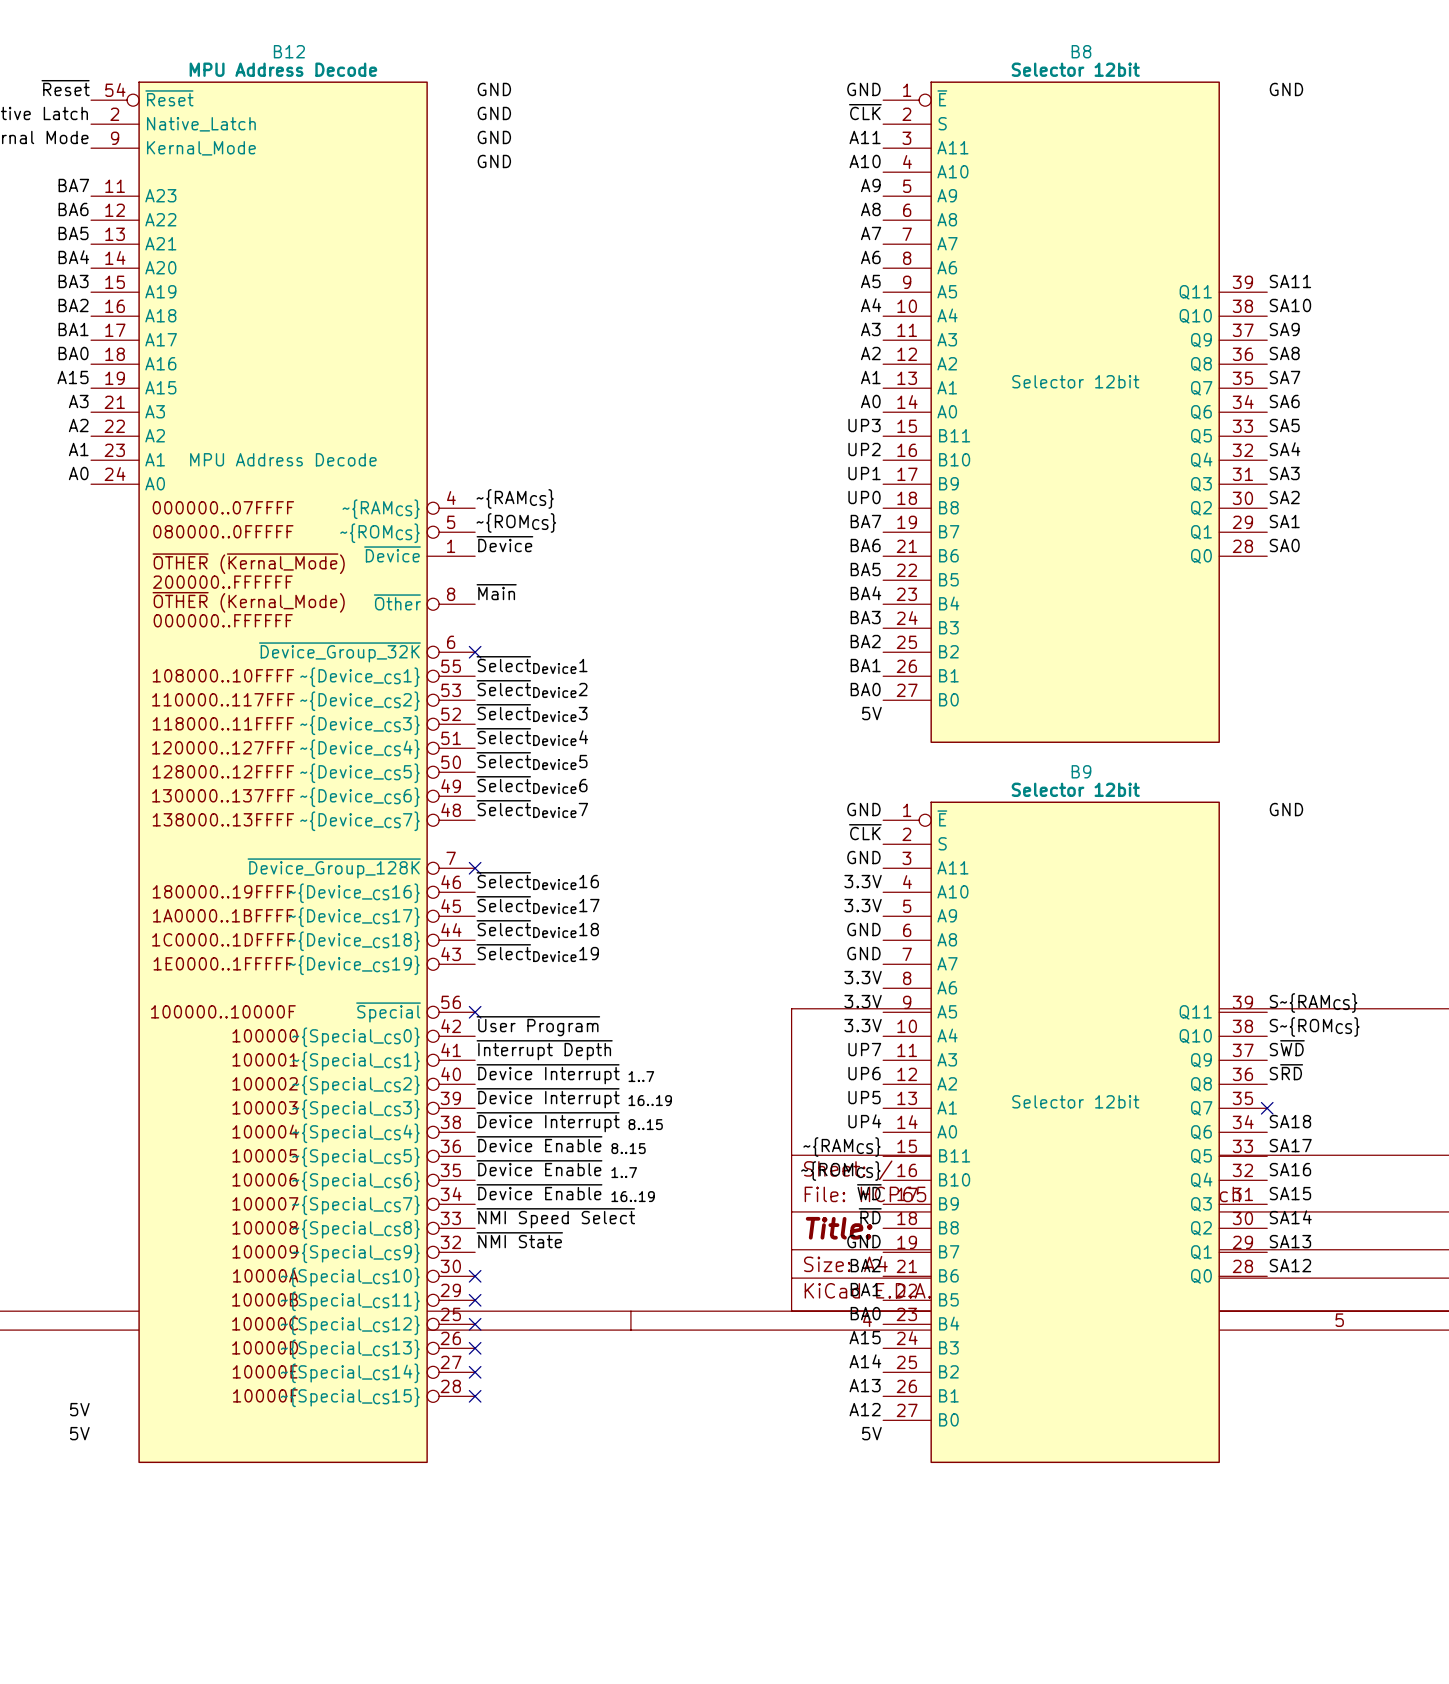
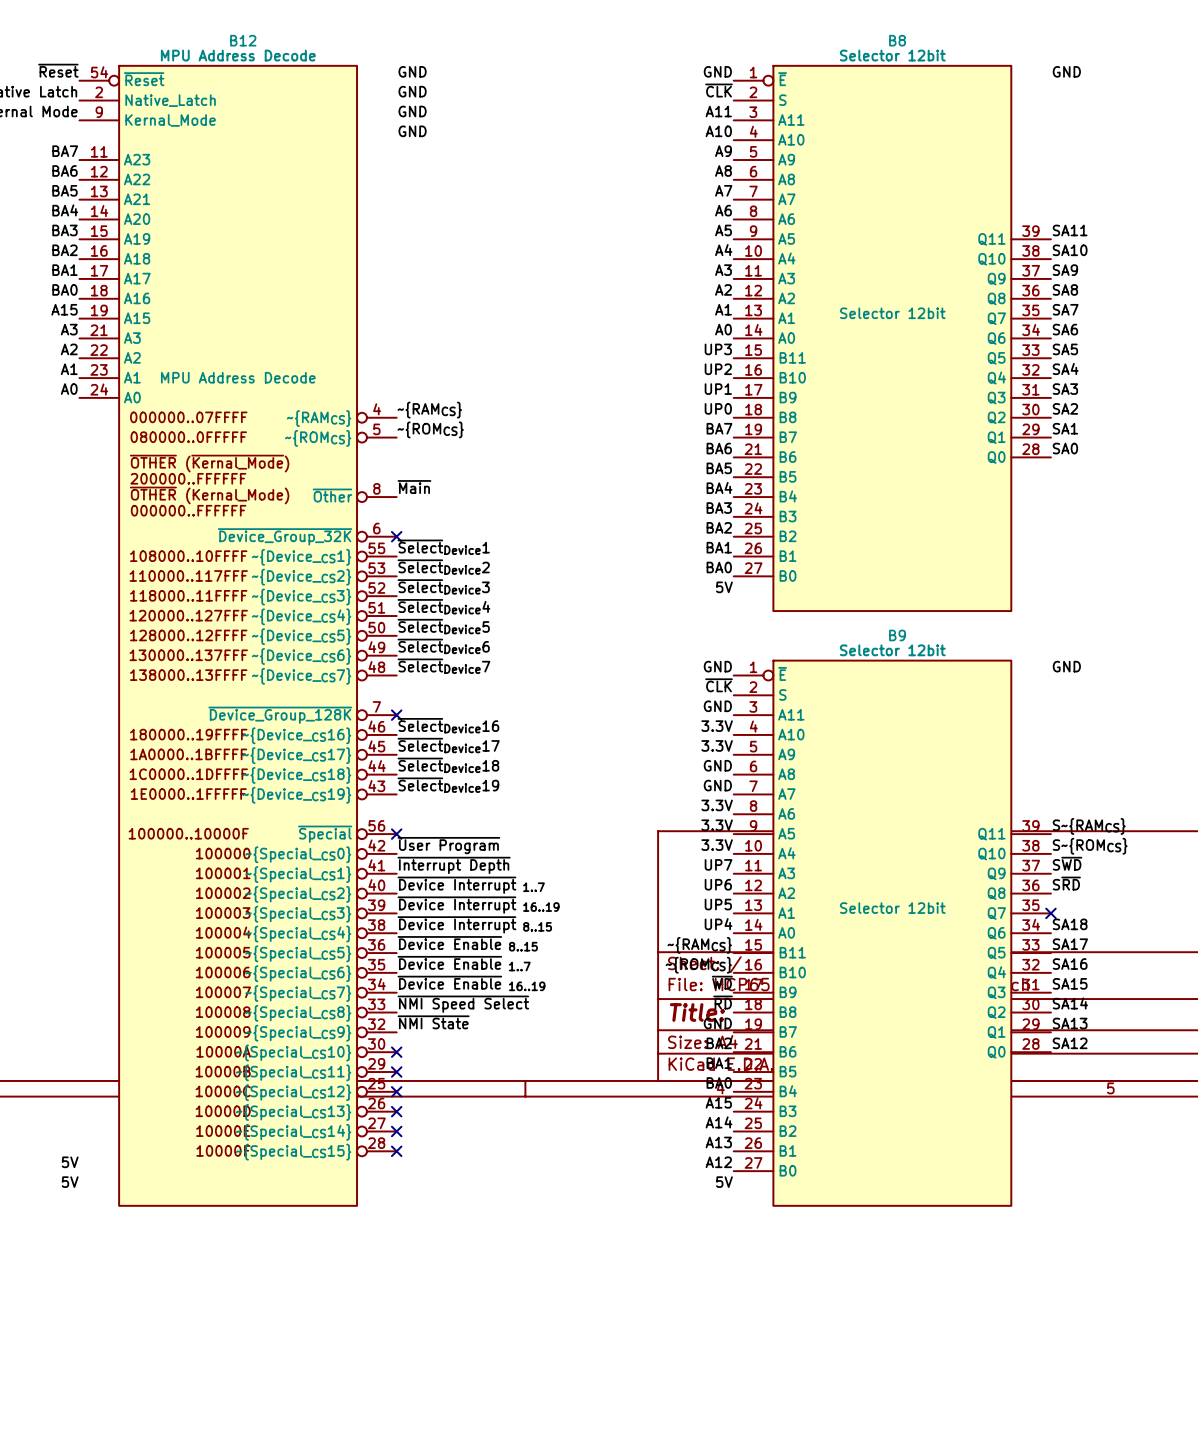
B12 symbol: [91, 81, 476, 1464] -> [79, 65, 397, 1207]
label: ~{Device} (504, 544) -> none

